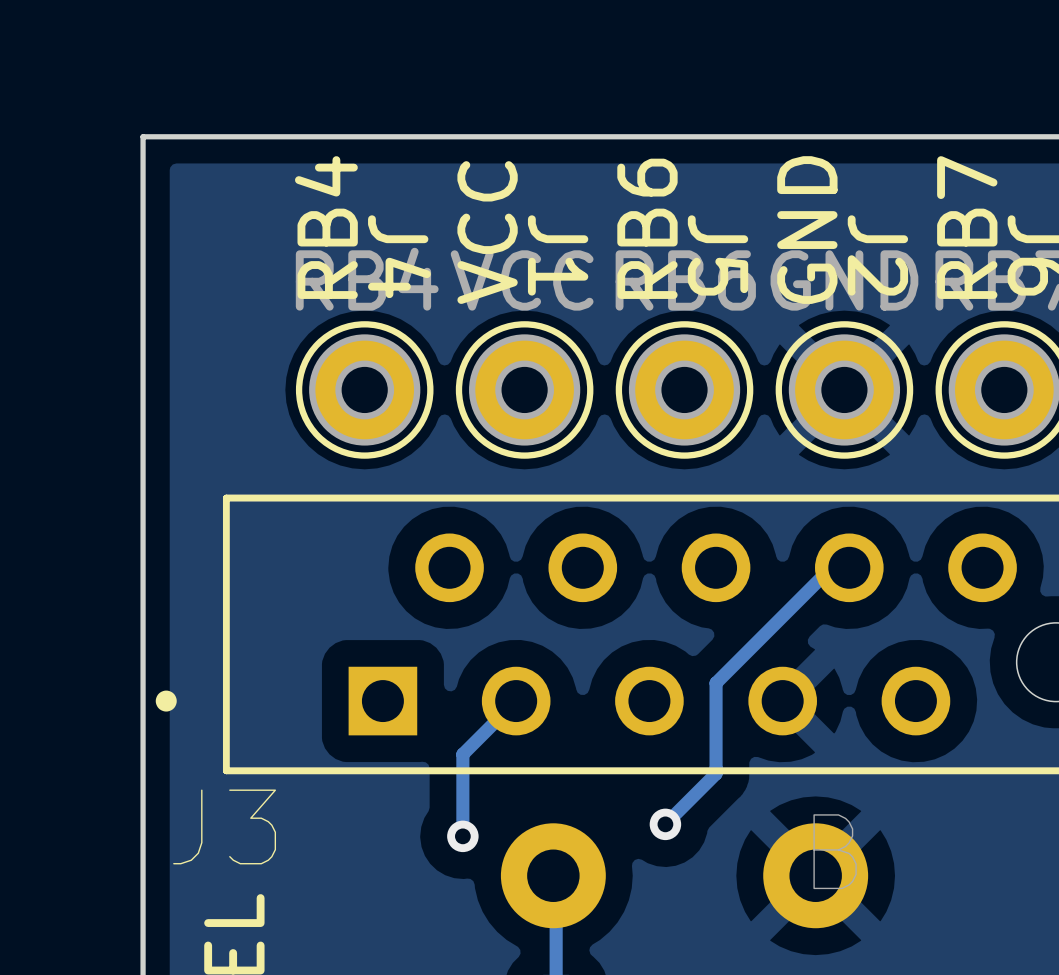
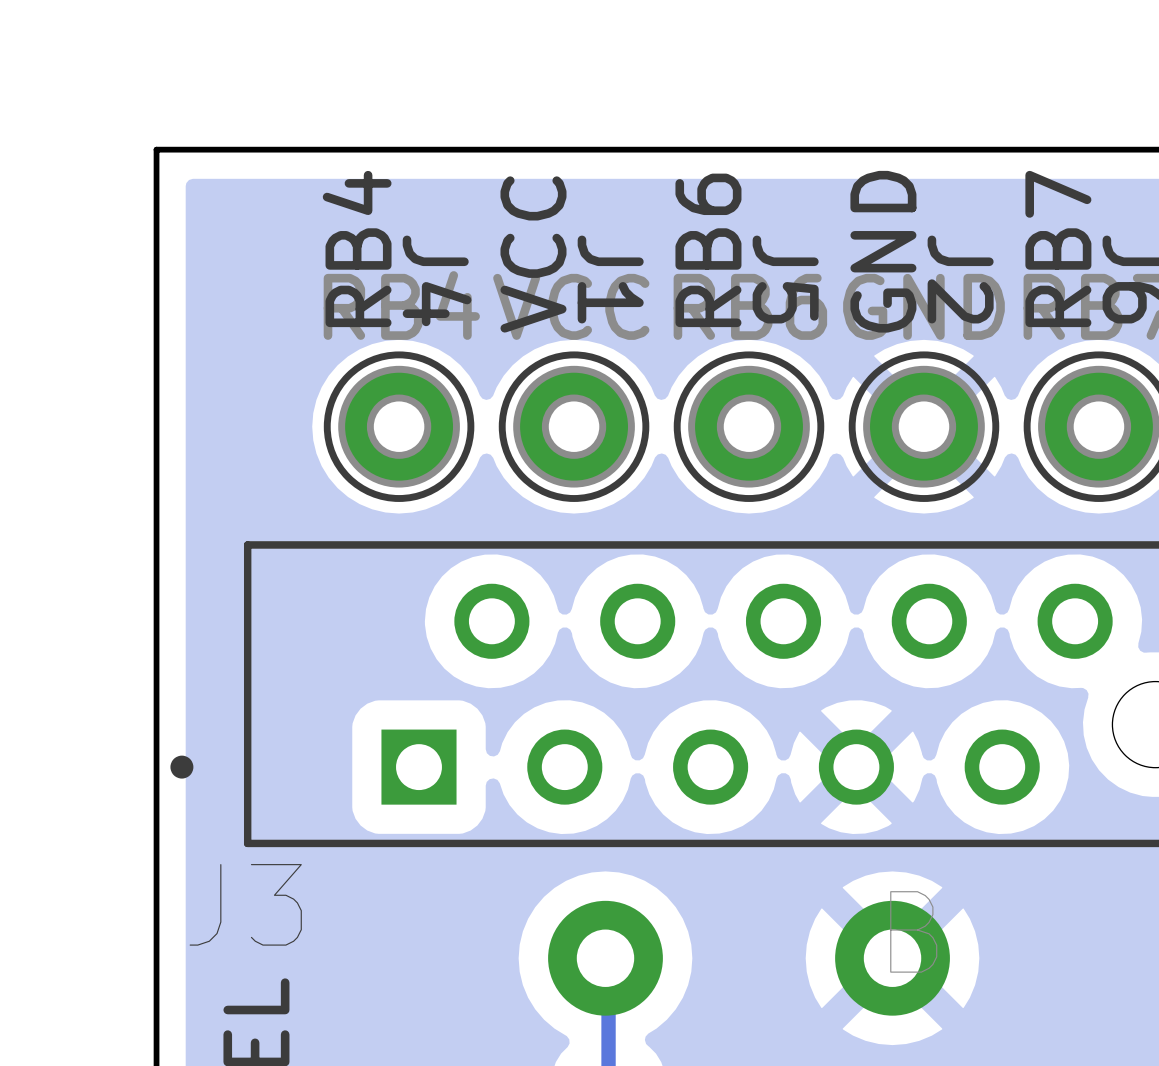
track: (849, 567) (831, 567) (716, 683) (716, 773) (665, 824) -> none
track: (516, 701) (462, 754) (462, 836) -> none
via: (665, 824) -> none
via: (462, 836) -> none

